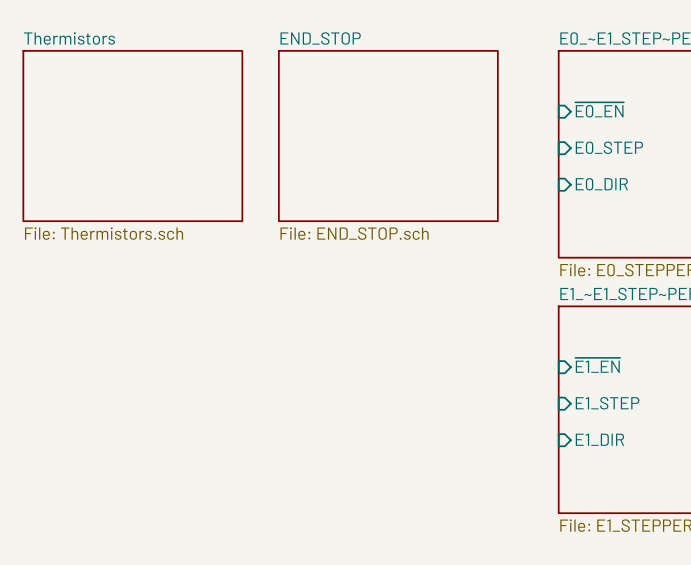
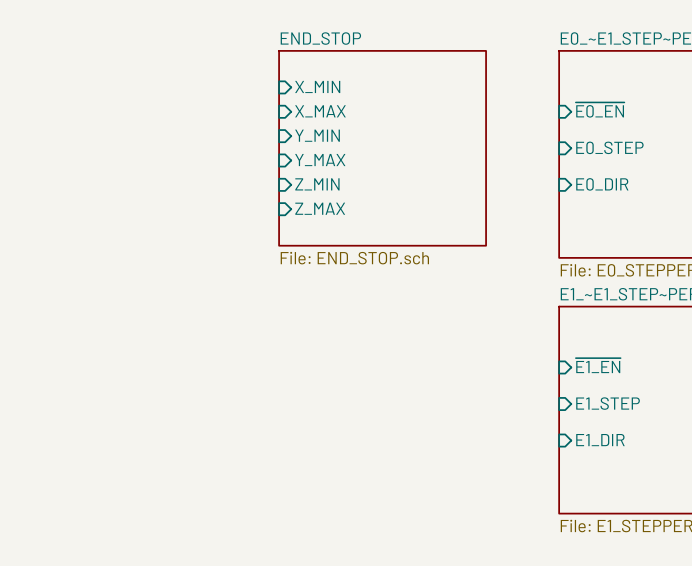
sheet pin: none -> X_MIN (317, 86)
sheet pin: none -> X_MAX (320, 111)
sheet pin: none -> Y_MIN (317, 135)
sheet Thermistors: File: Thermistors.sch (132, 136) -> none
sheet END_STOP: File: END_STOP.sch (388, 136) -> none
sheet END_STOP: none -> File: END_STOP.sch (382, 148)
sheet pin: none -> Y_MAX (320, 160)
sheet pin: none -> Z_MIN (317, 184)
sheet pin: none -> Z_MAX (320, 208)

